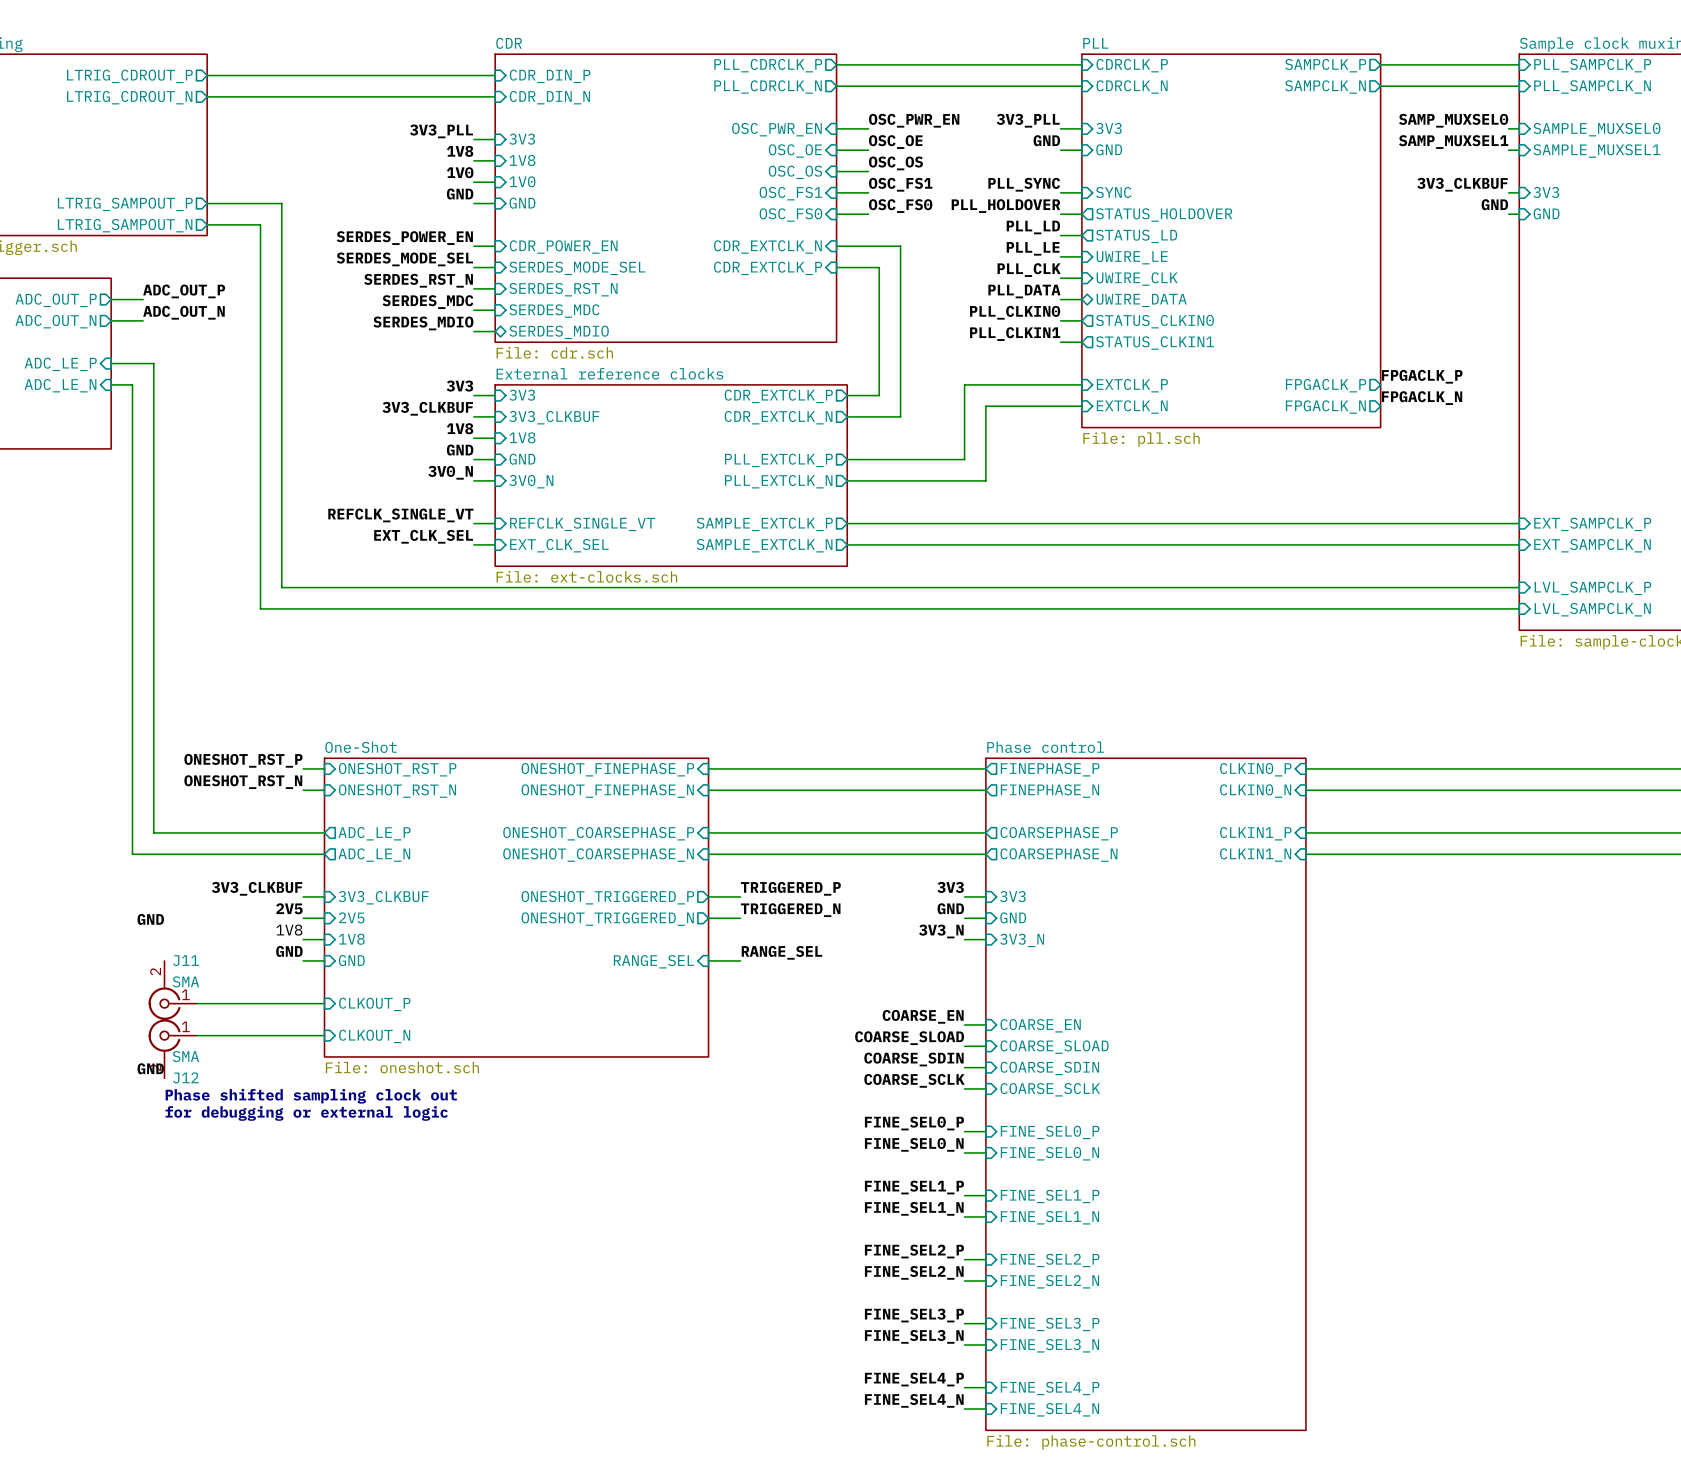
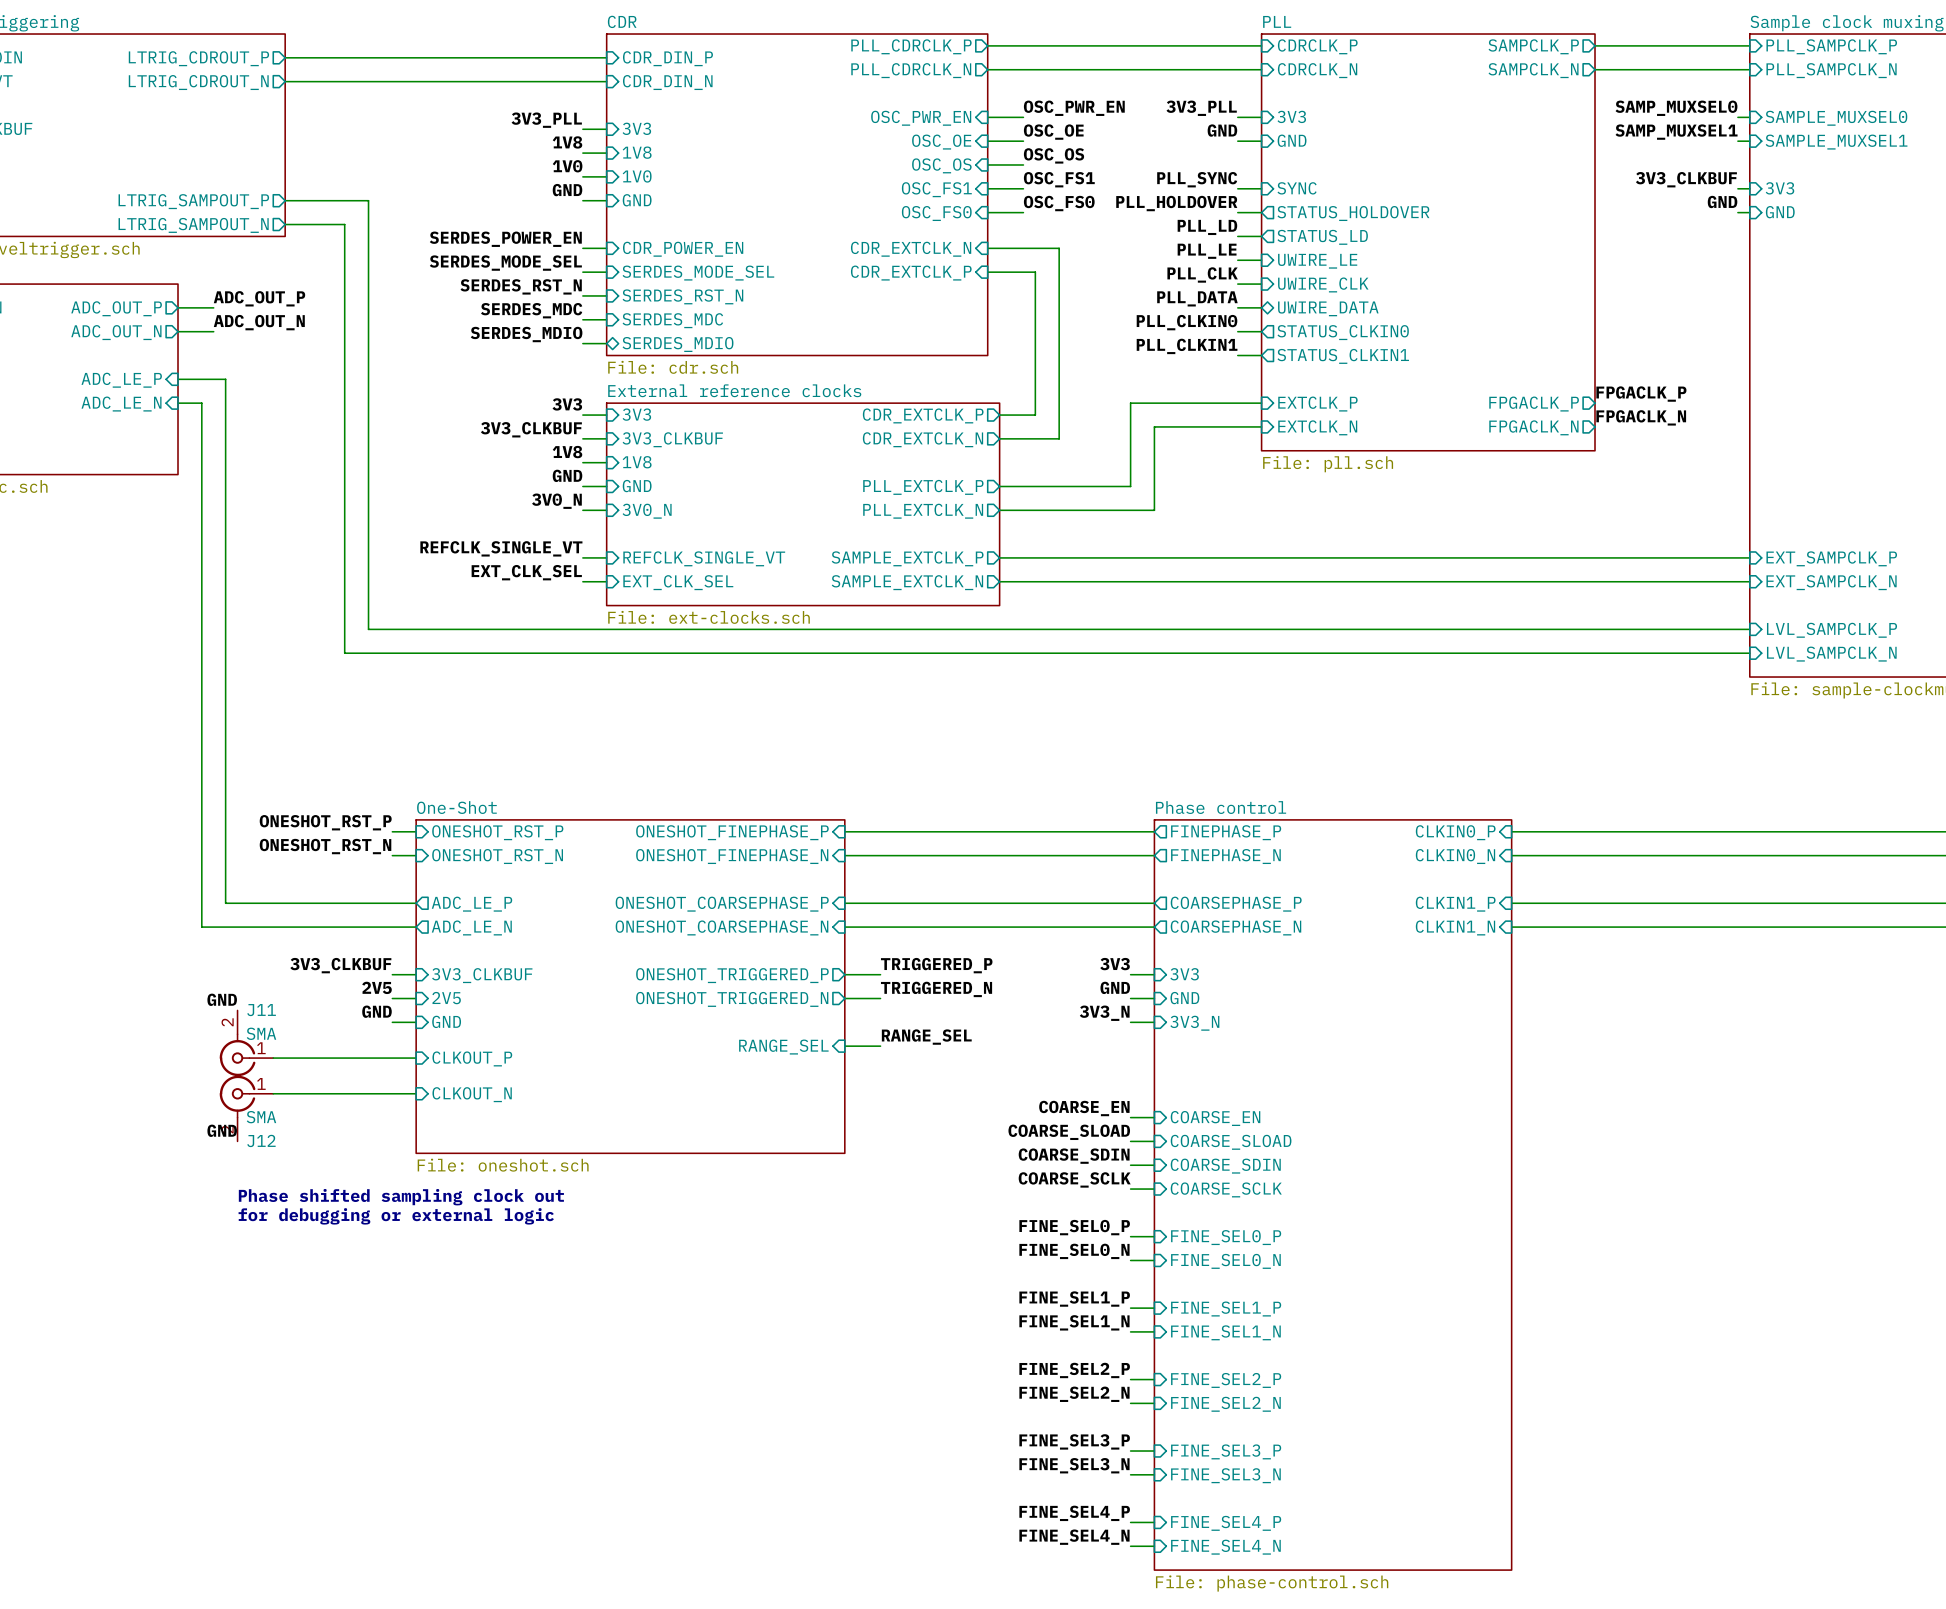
label: 1V8 (289, 930) -> GND (376, 1011)
sheet pin: 1V8 (351, 939) -> GND (446, 1021)
label: GND (289, 951) -> none
wire: (303, 960) (324, 960) -> none
sheet pin: GND (351, 960) -> none
sheet pin: none -> CLKOUT_P (472, 1058)
J11 position: (172, 990) -> (246, 1043)
sheet pin: CLKOUT_P (374, 1004) -> CLKOUT_N (472, 1094)
wire: (196, 1035) (324, 1035) -> (273, 1058) (416, 1058)
sheet pin: CLKOUT_N (374, 1036) -> none
J12 position: (172, 1048) -> (246, 1108)
label position: GND (150, 1068) -> GND (222, 1130)

